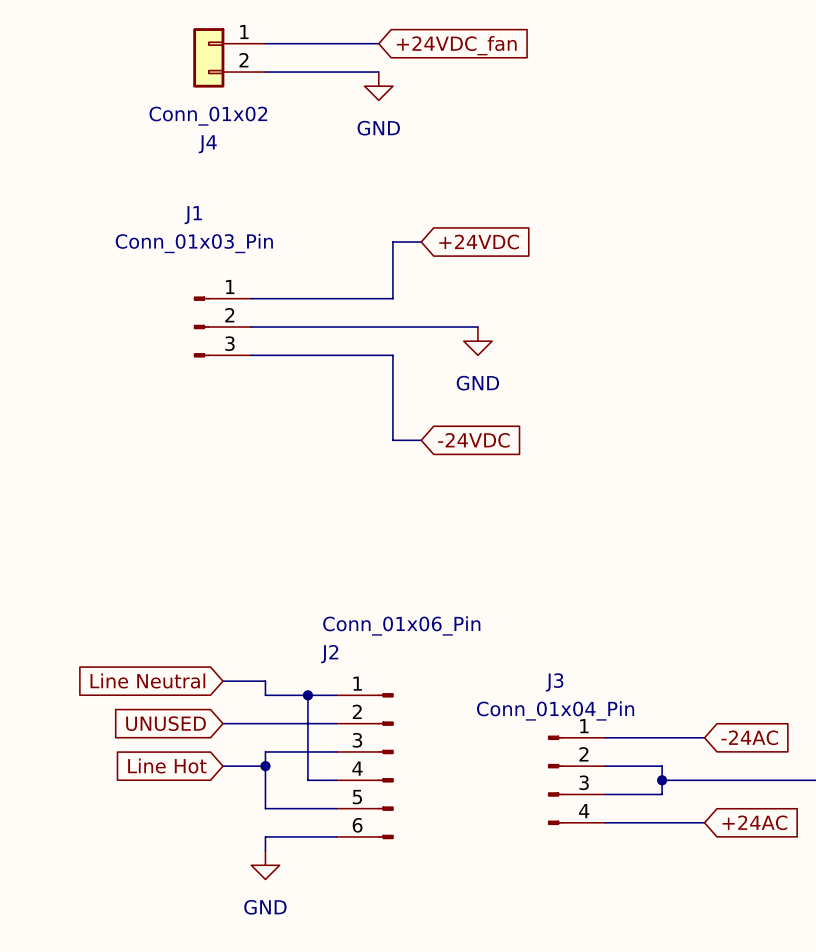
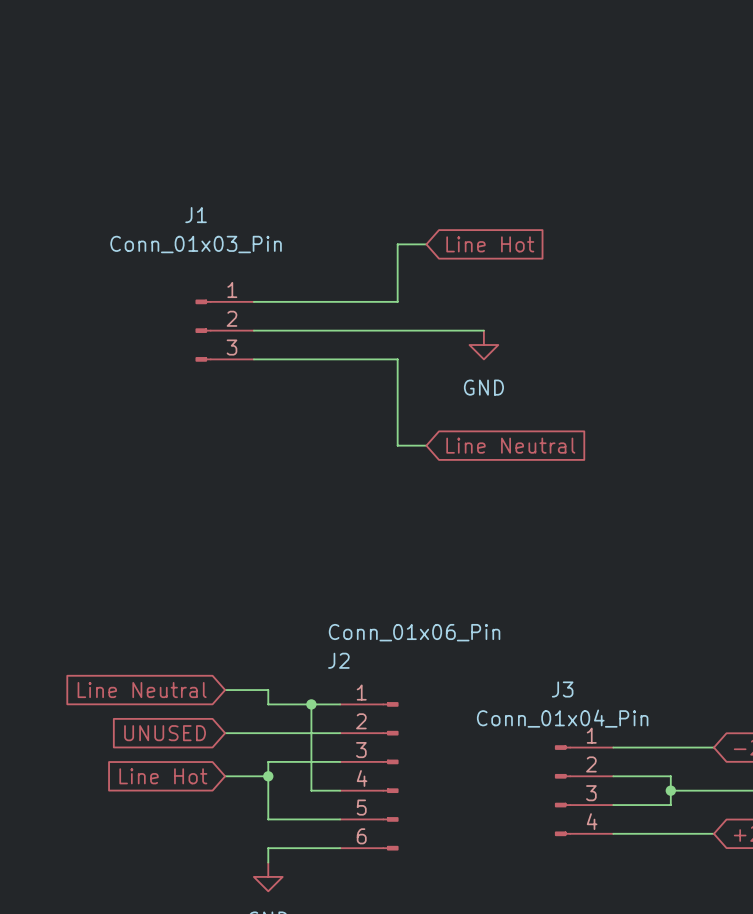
wire: (265, 43) (378, 43) -> none
global label: +24VDC_fan (456, 45) -> none
J4: Conn_01x02 (229, 57) -> none
wire: (265, 72) (378, 72) -> none
power symbol: GND (378, 86) -> none
global label: +24VDC (479, 242) -> Line Hot (490, 244)
global label: -24VDC (473, 440) -> Line Neutral (510, 445)

